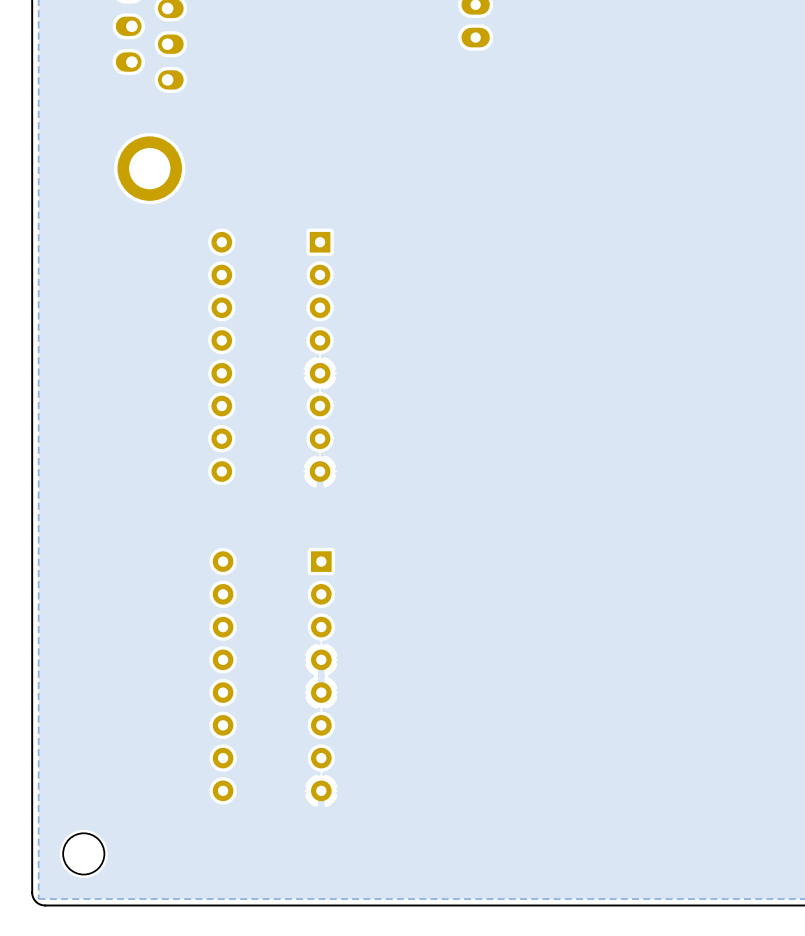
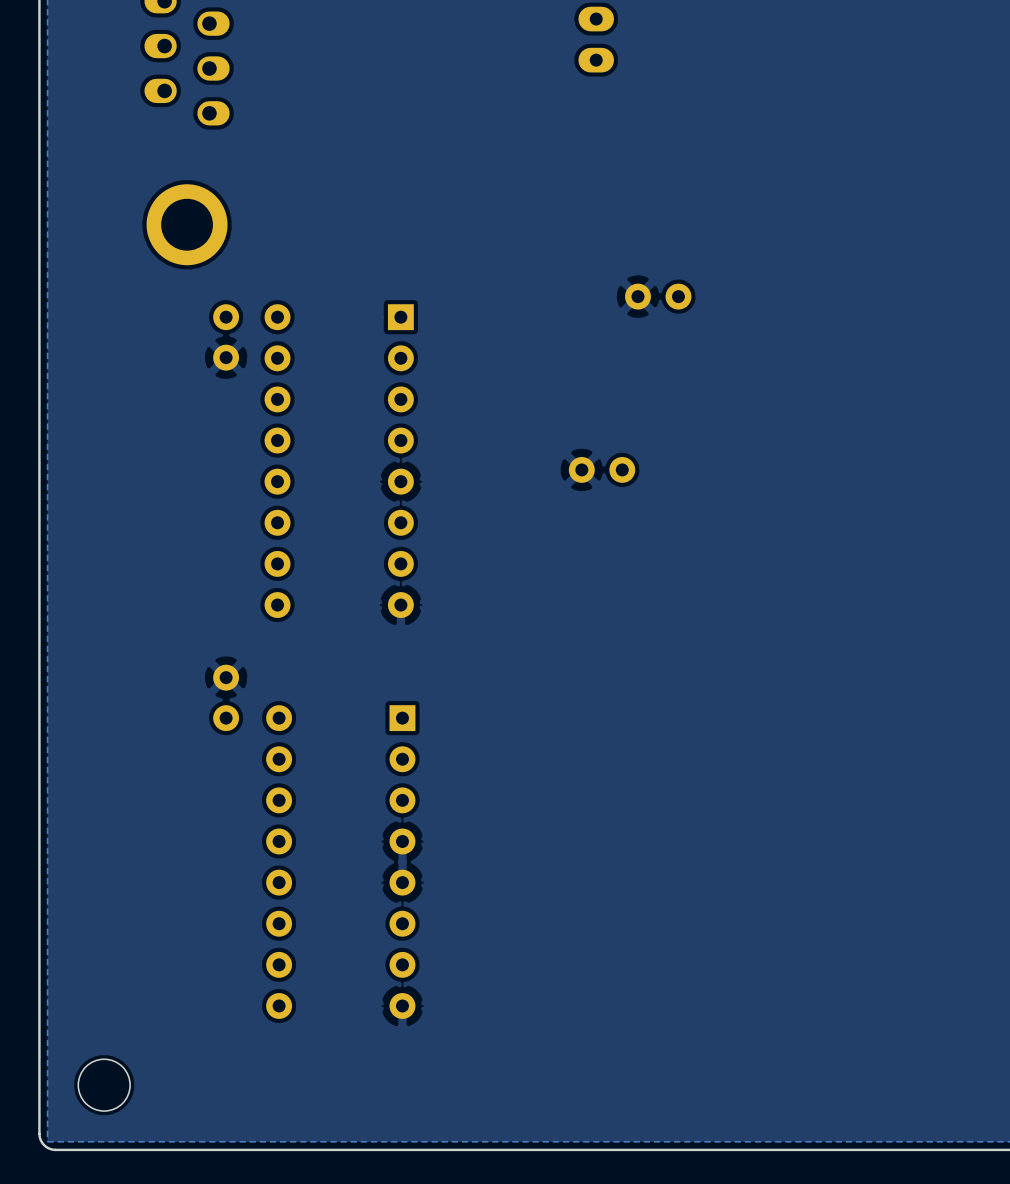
part: none -> (658, 296)
part: none -> (226, 337)
part: none -> (602, 469)
part: none -> (226, 697)

